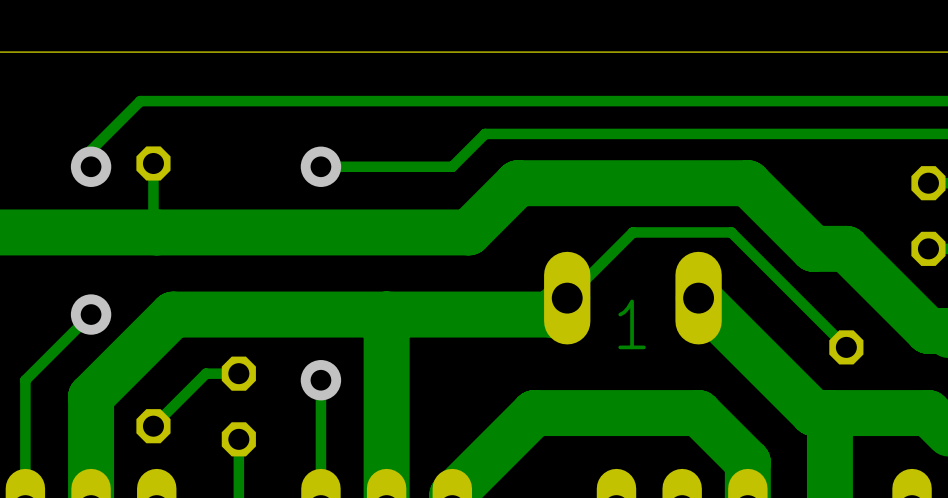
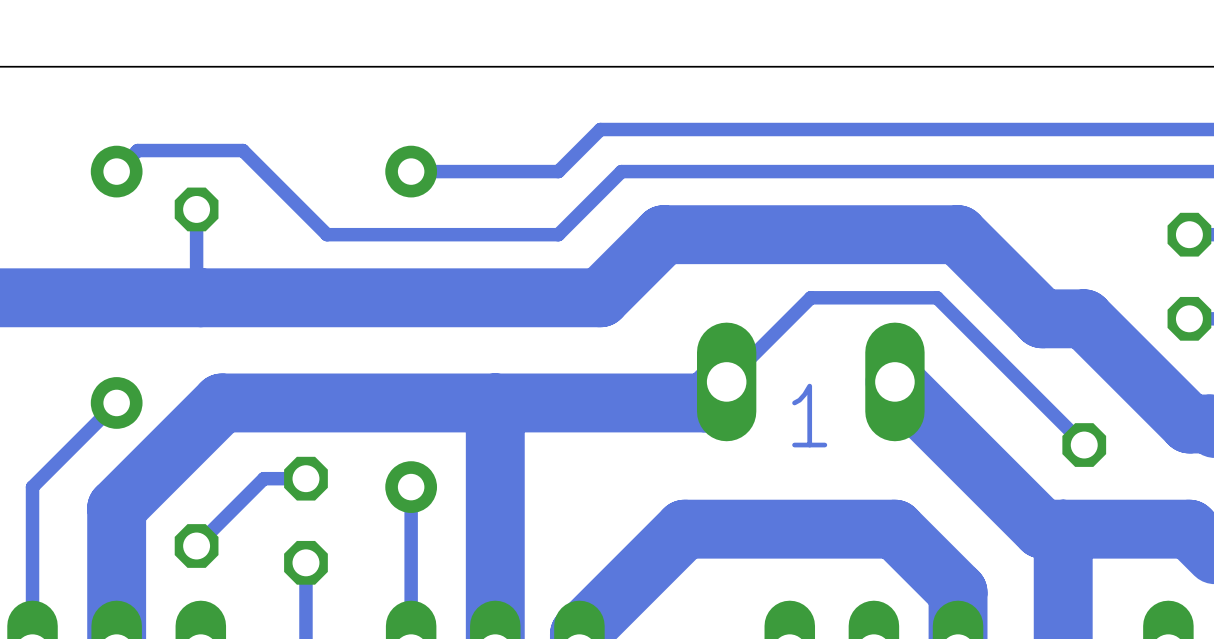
bottom track: (468, 101) (140, 101) (91, 150) (91, 166) -> (600, 129) (558, 171) (411, 171)
via position: (91, 166) -> (116, 171)
via position: (320, 166) -> (411, 171)
bottom track: (452, 166) (320, 166) -> (579, 213) (558, 234) (327, 234) (242, 150) (137, 150) (116, 171)

